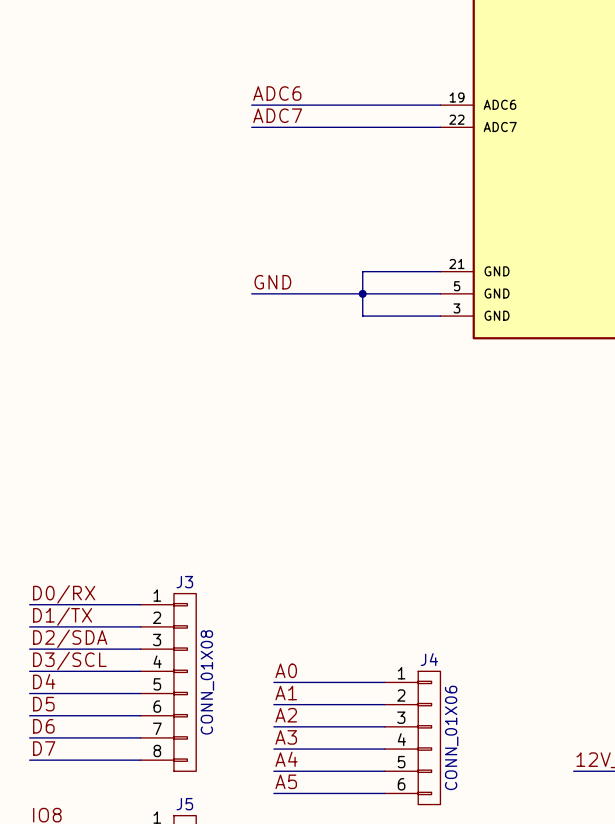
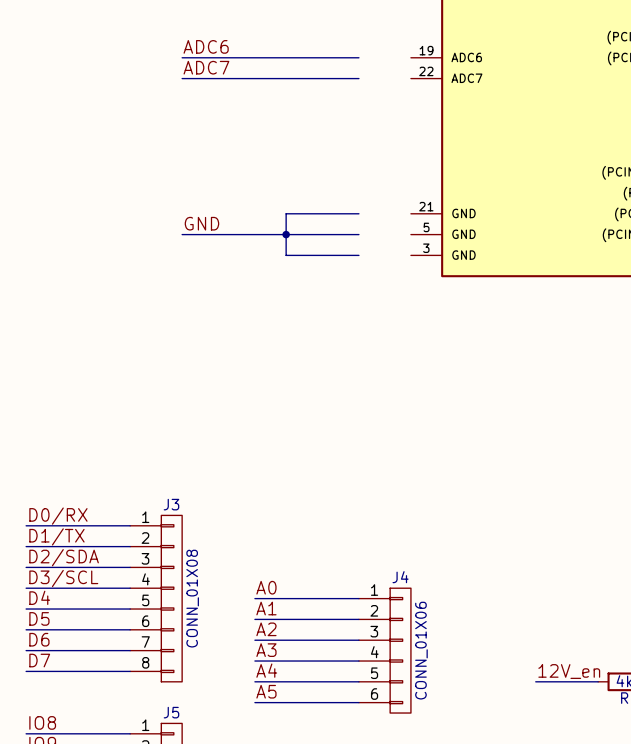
label position: ADC6 (277, 93) -> ADC6 (206, 46)
wire: (384, 105) (440, 105) -> (182, 57) (234, 57)
label position: ADC7 (277, 115) -> ADC7 (206, 67)
wire: (384, 127) (440, 127) -> (182, 78) (234, 78)
wire: (362, 271) (362, 316) -> (338, 213) (286, 213) (286, 255) (338, 255)
wire: (384, 271) (440, 271) -> none
label position: GND (272, 282) -> GND (201, 223)
junction: none -> (286, 234)
junction: (362, 293) -> none
wire: (384, 293) (440, 293) -> (182, 234) (234, 234)
wire: (384, 316) (440, 316) -> none

